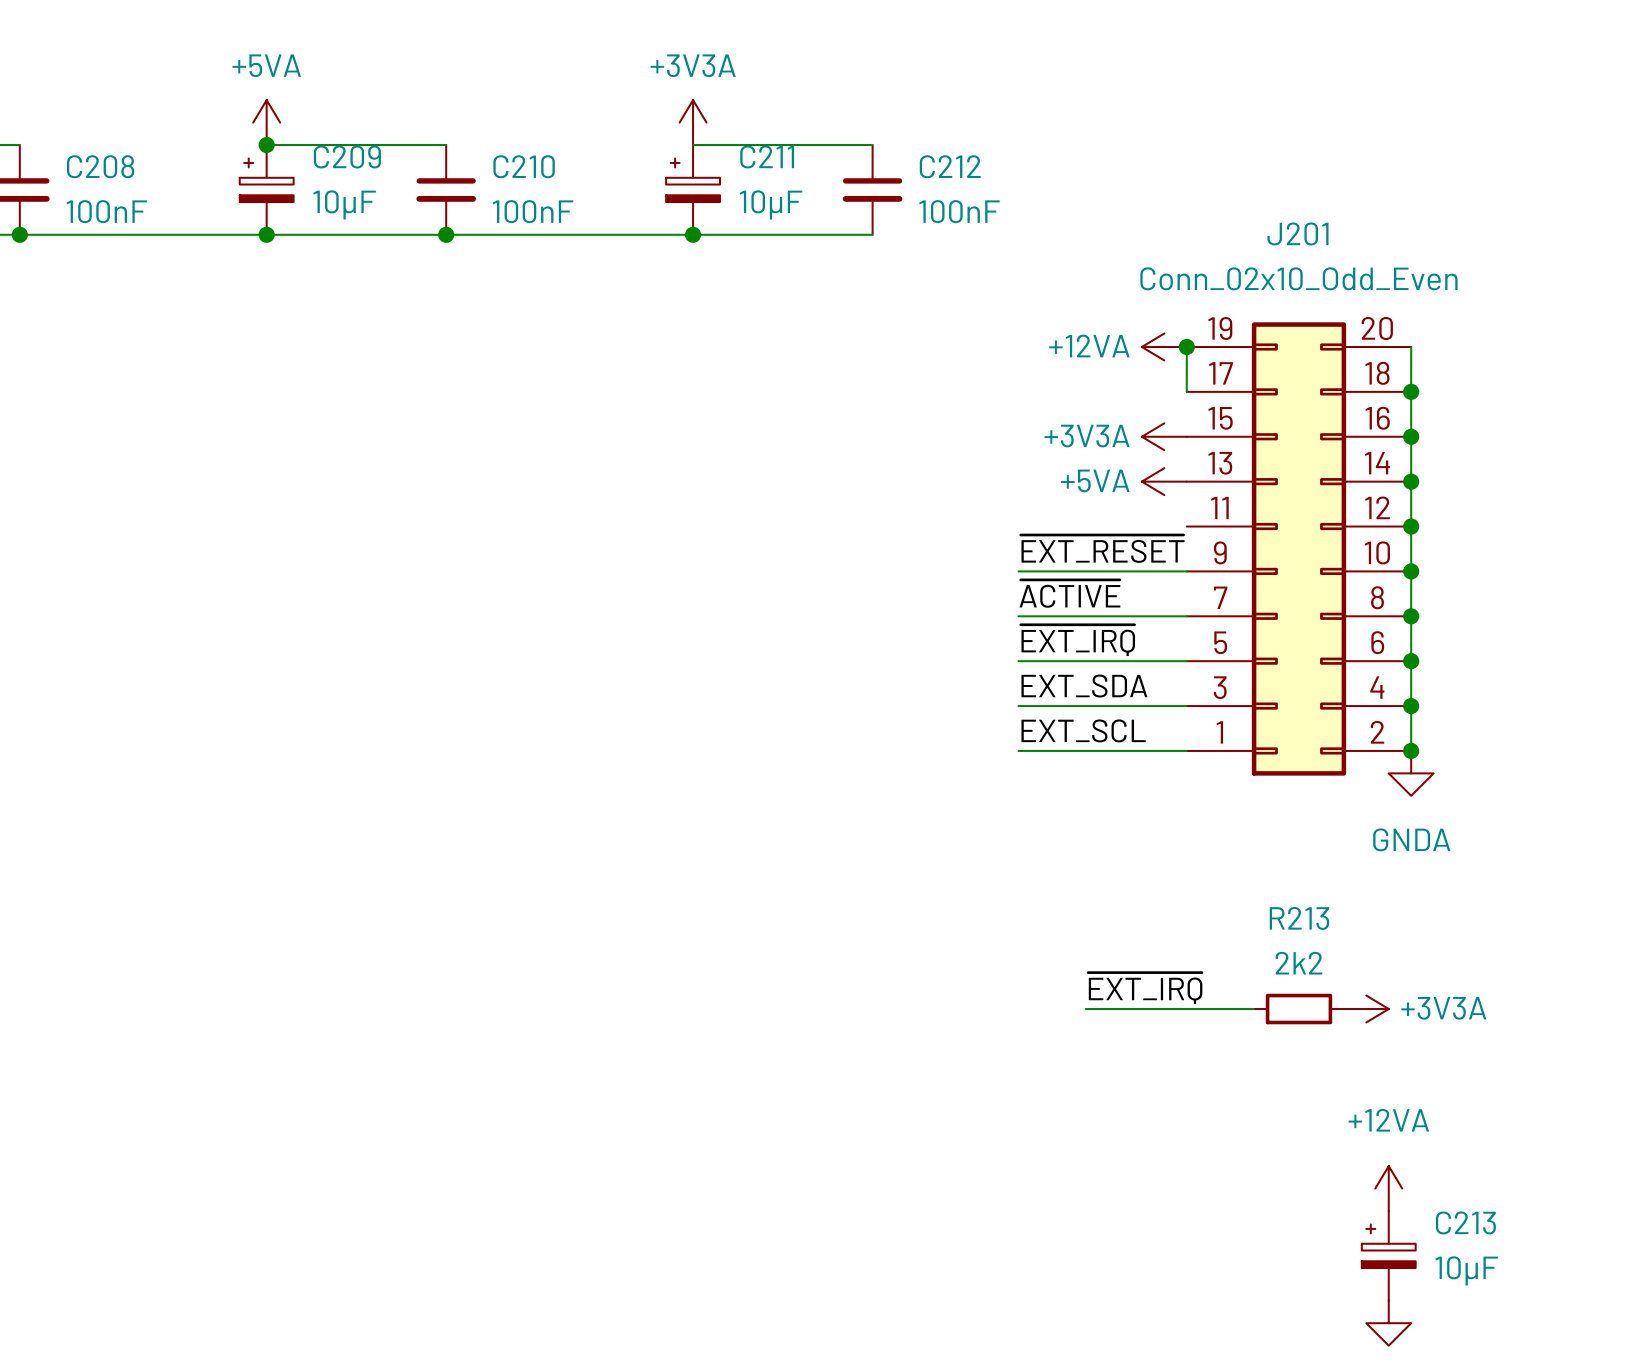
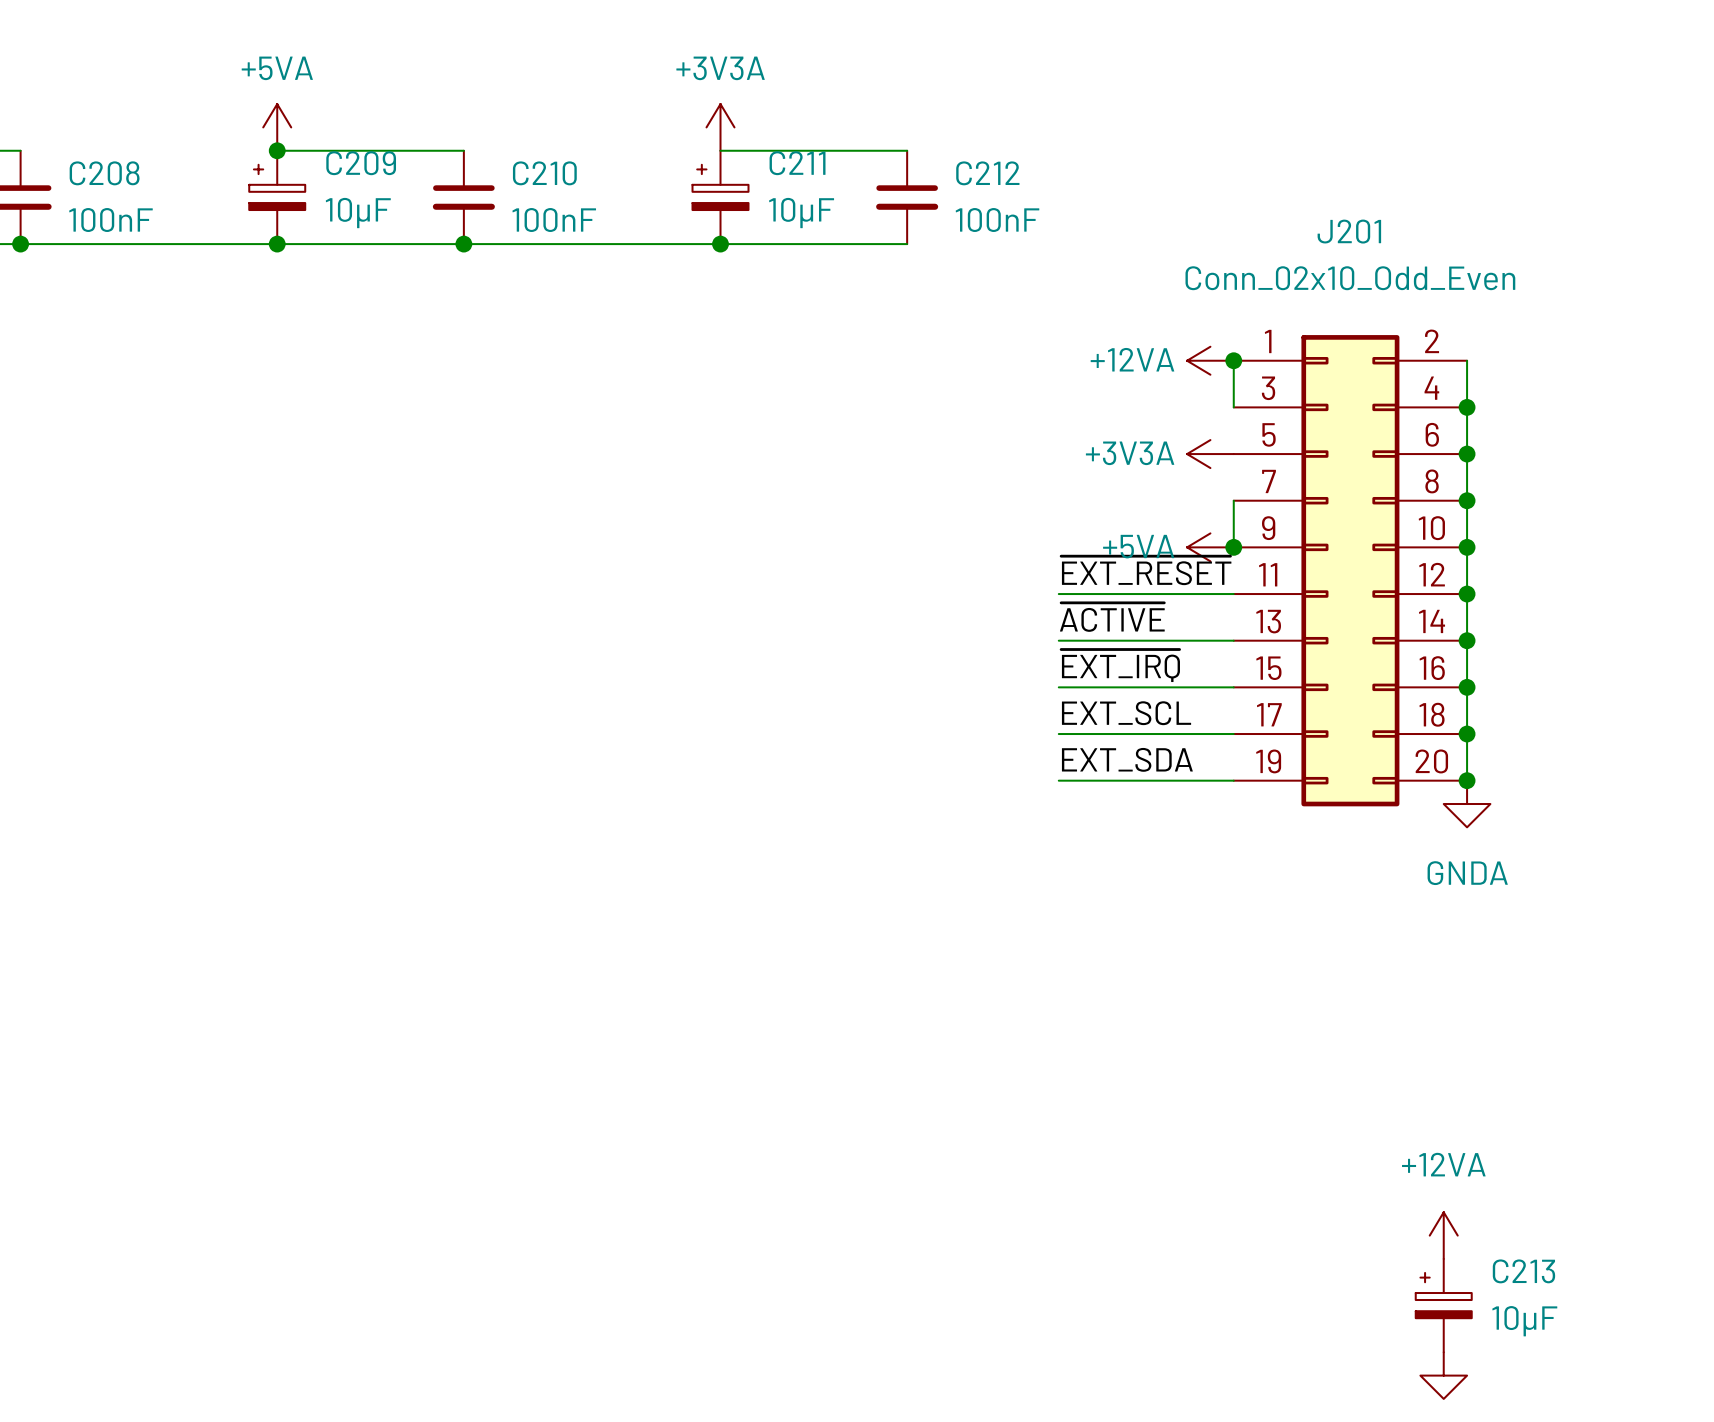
power symbol position: +5VA (1164, 481) -> +5VA (1210, 547)
wire: none -> (1233, 500) (1233, 547)
junction: none -> (1233, 547)
J201 flip: as is (1298, 548) -> up-down (1350, 570)
label: EXT_SDA (1084, 686) -> EXT_SCL (1126, 713)
label: EXT_SCL (1083, 730) -> EXT_SDA (1127, 759)
label: ~{EXT_IRQ} (1145, 988) -> none
wire: (1085, 1009) (1254, 1009) -> none
R213: 2k2 (1298, 1009) -> none
power symbol: +3V3A (1366, 1009) -> none

